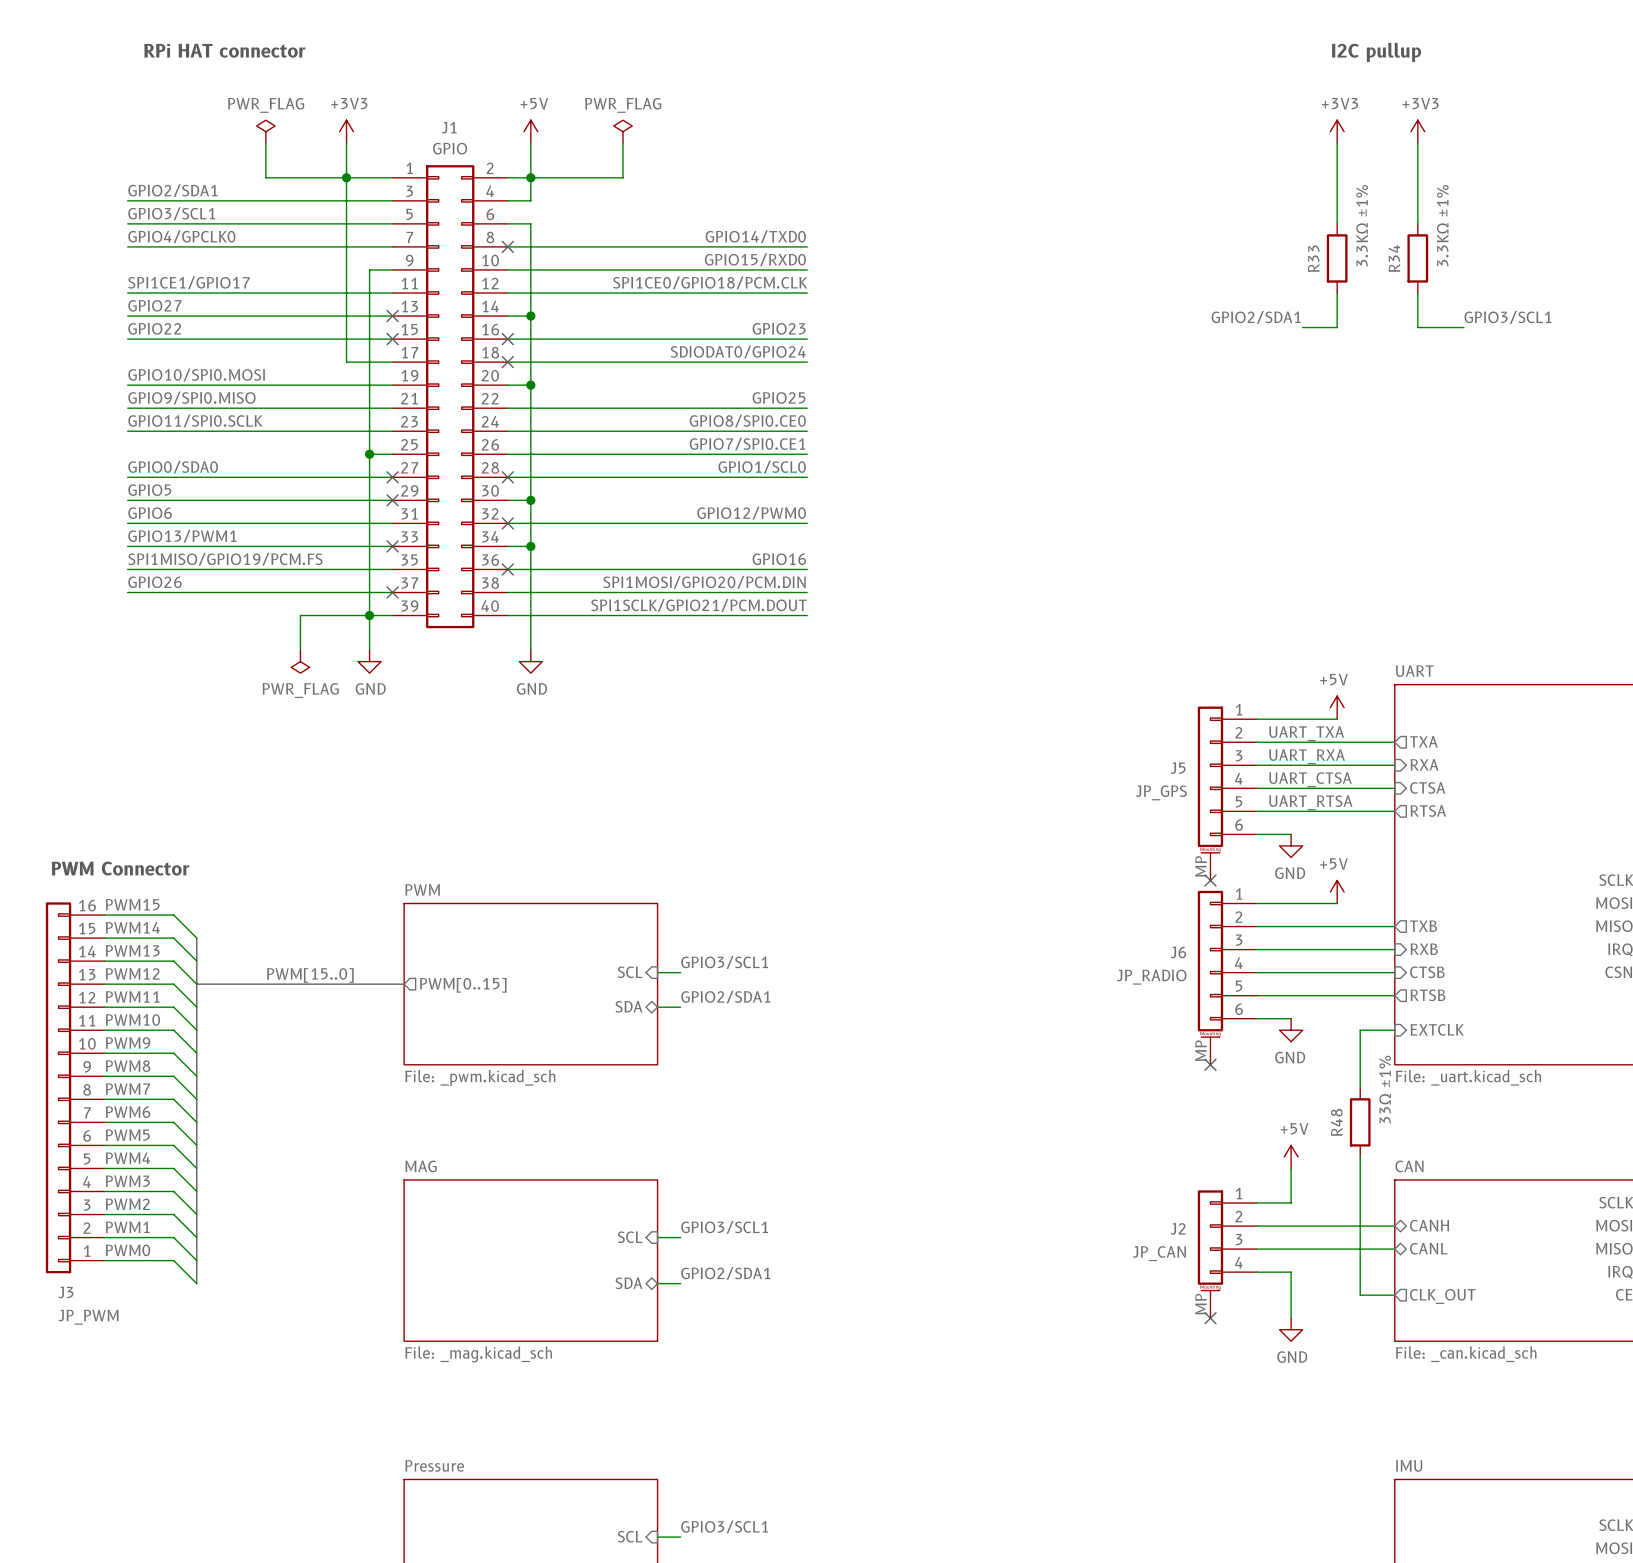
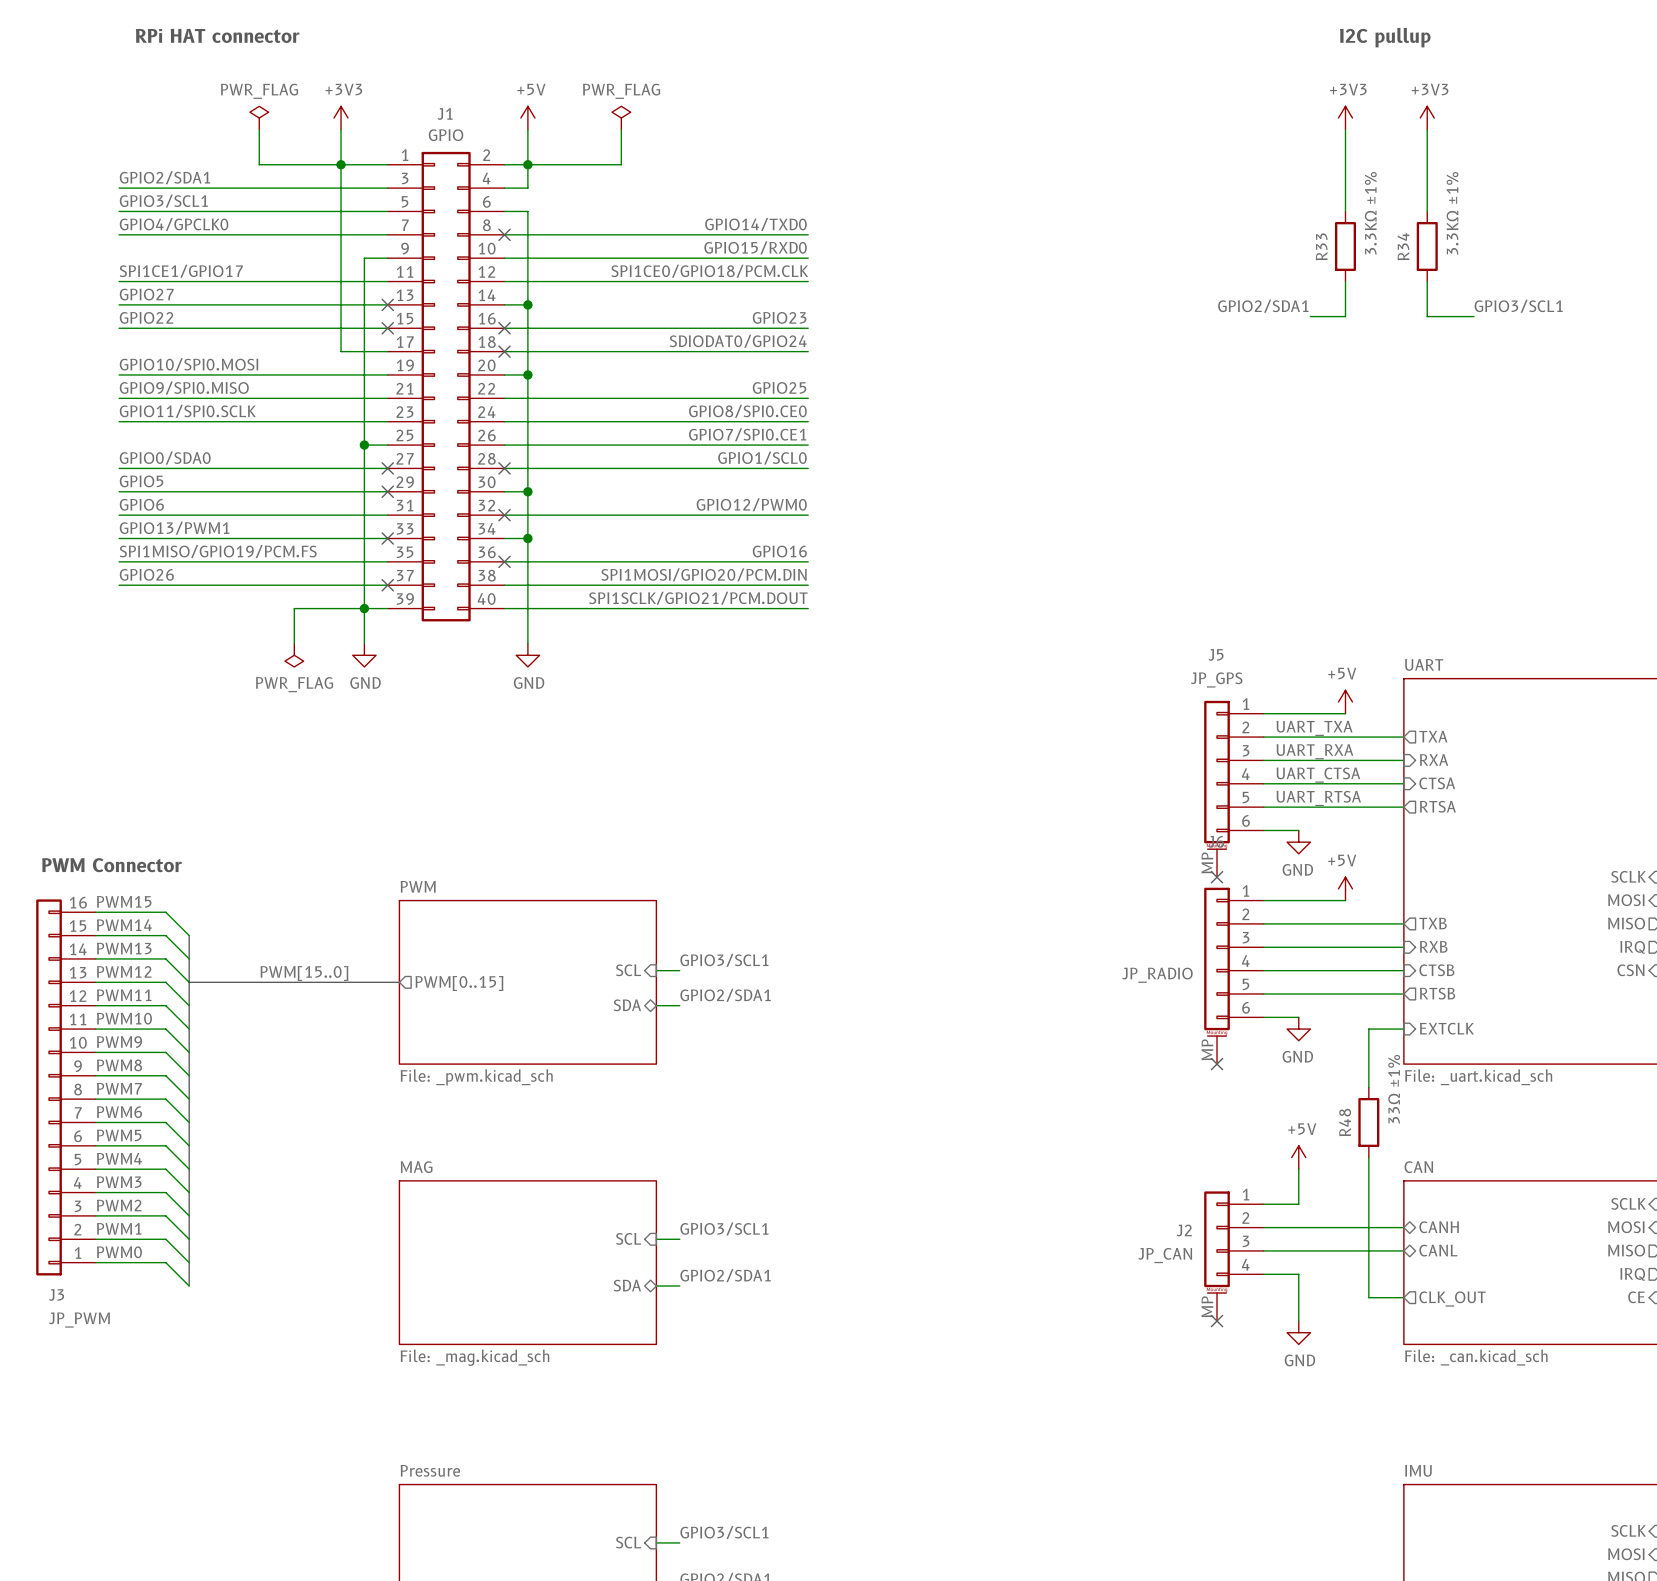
J5 name position: J5 (1178, 768) -> J5 (1216, 654)
J5 value position: JP_GPS (1161, 792) -> JP_GPS (1216, 679)
J6 name position: J6 (1178, 952) -> J6 (1216, 841)

